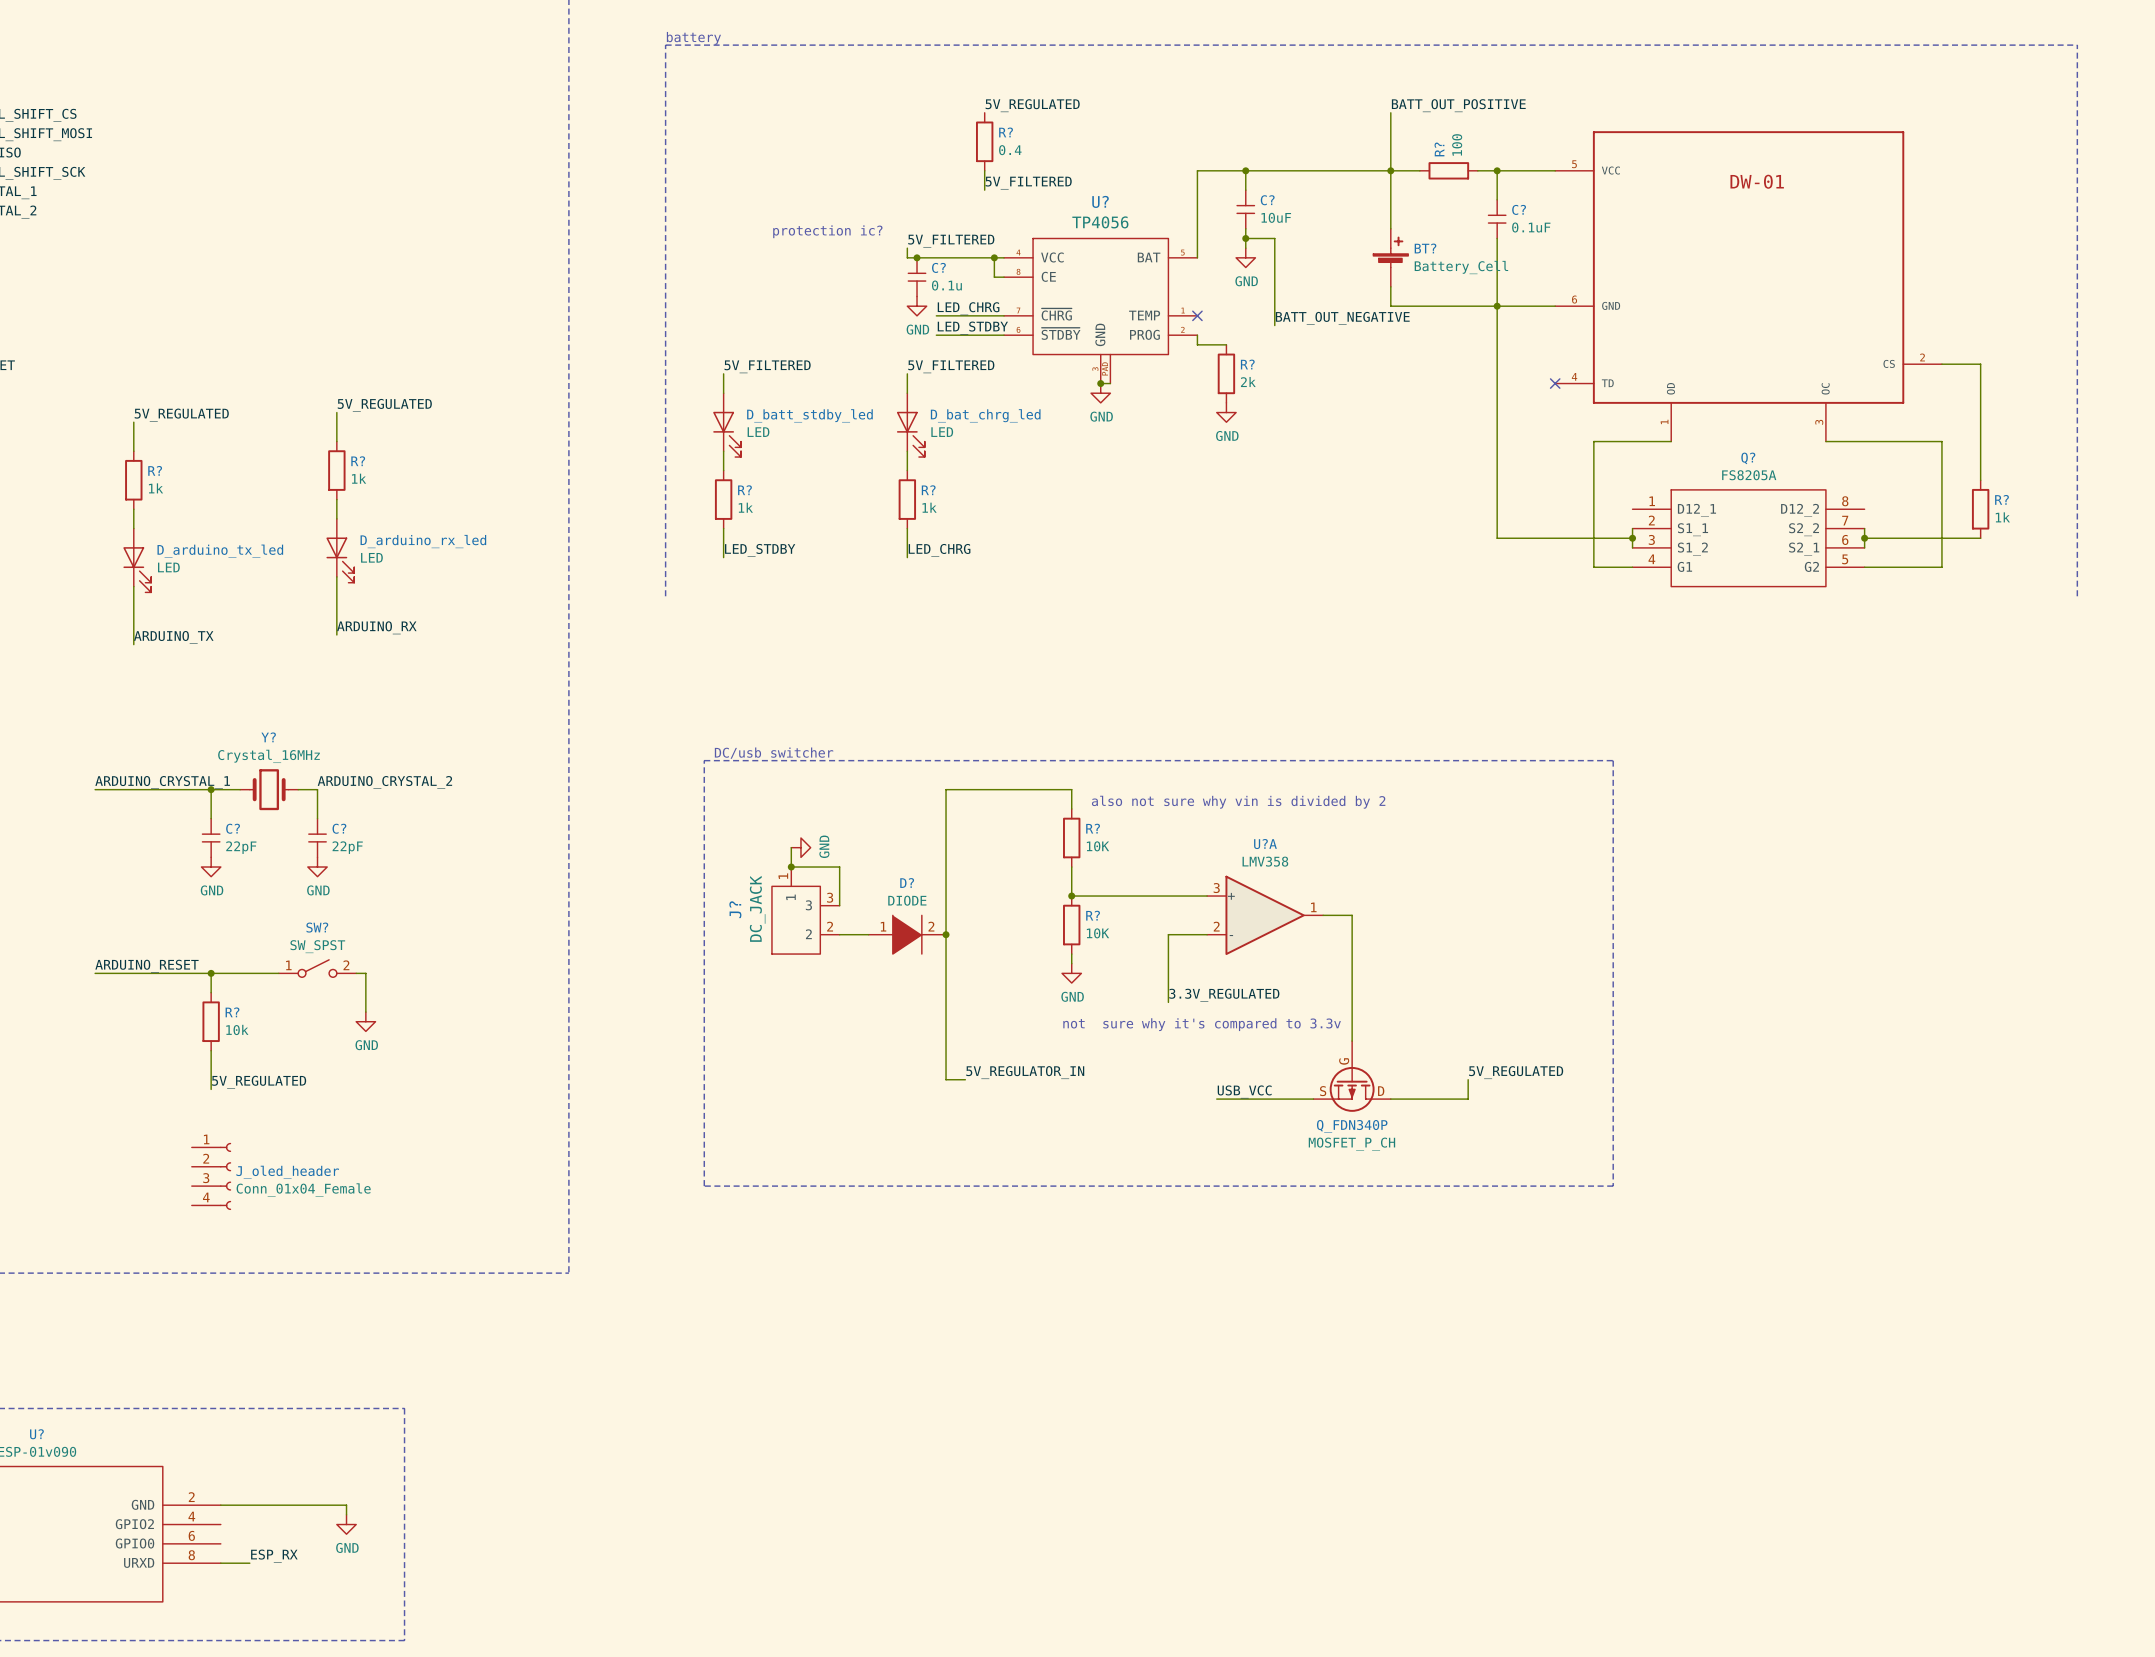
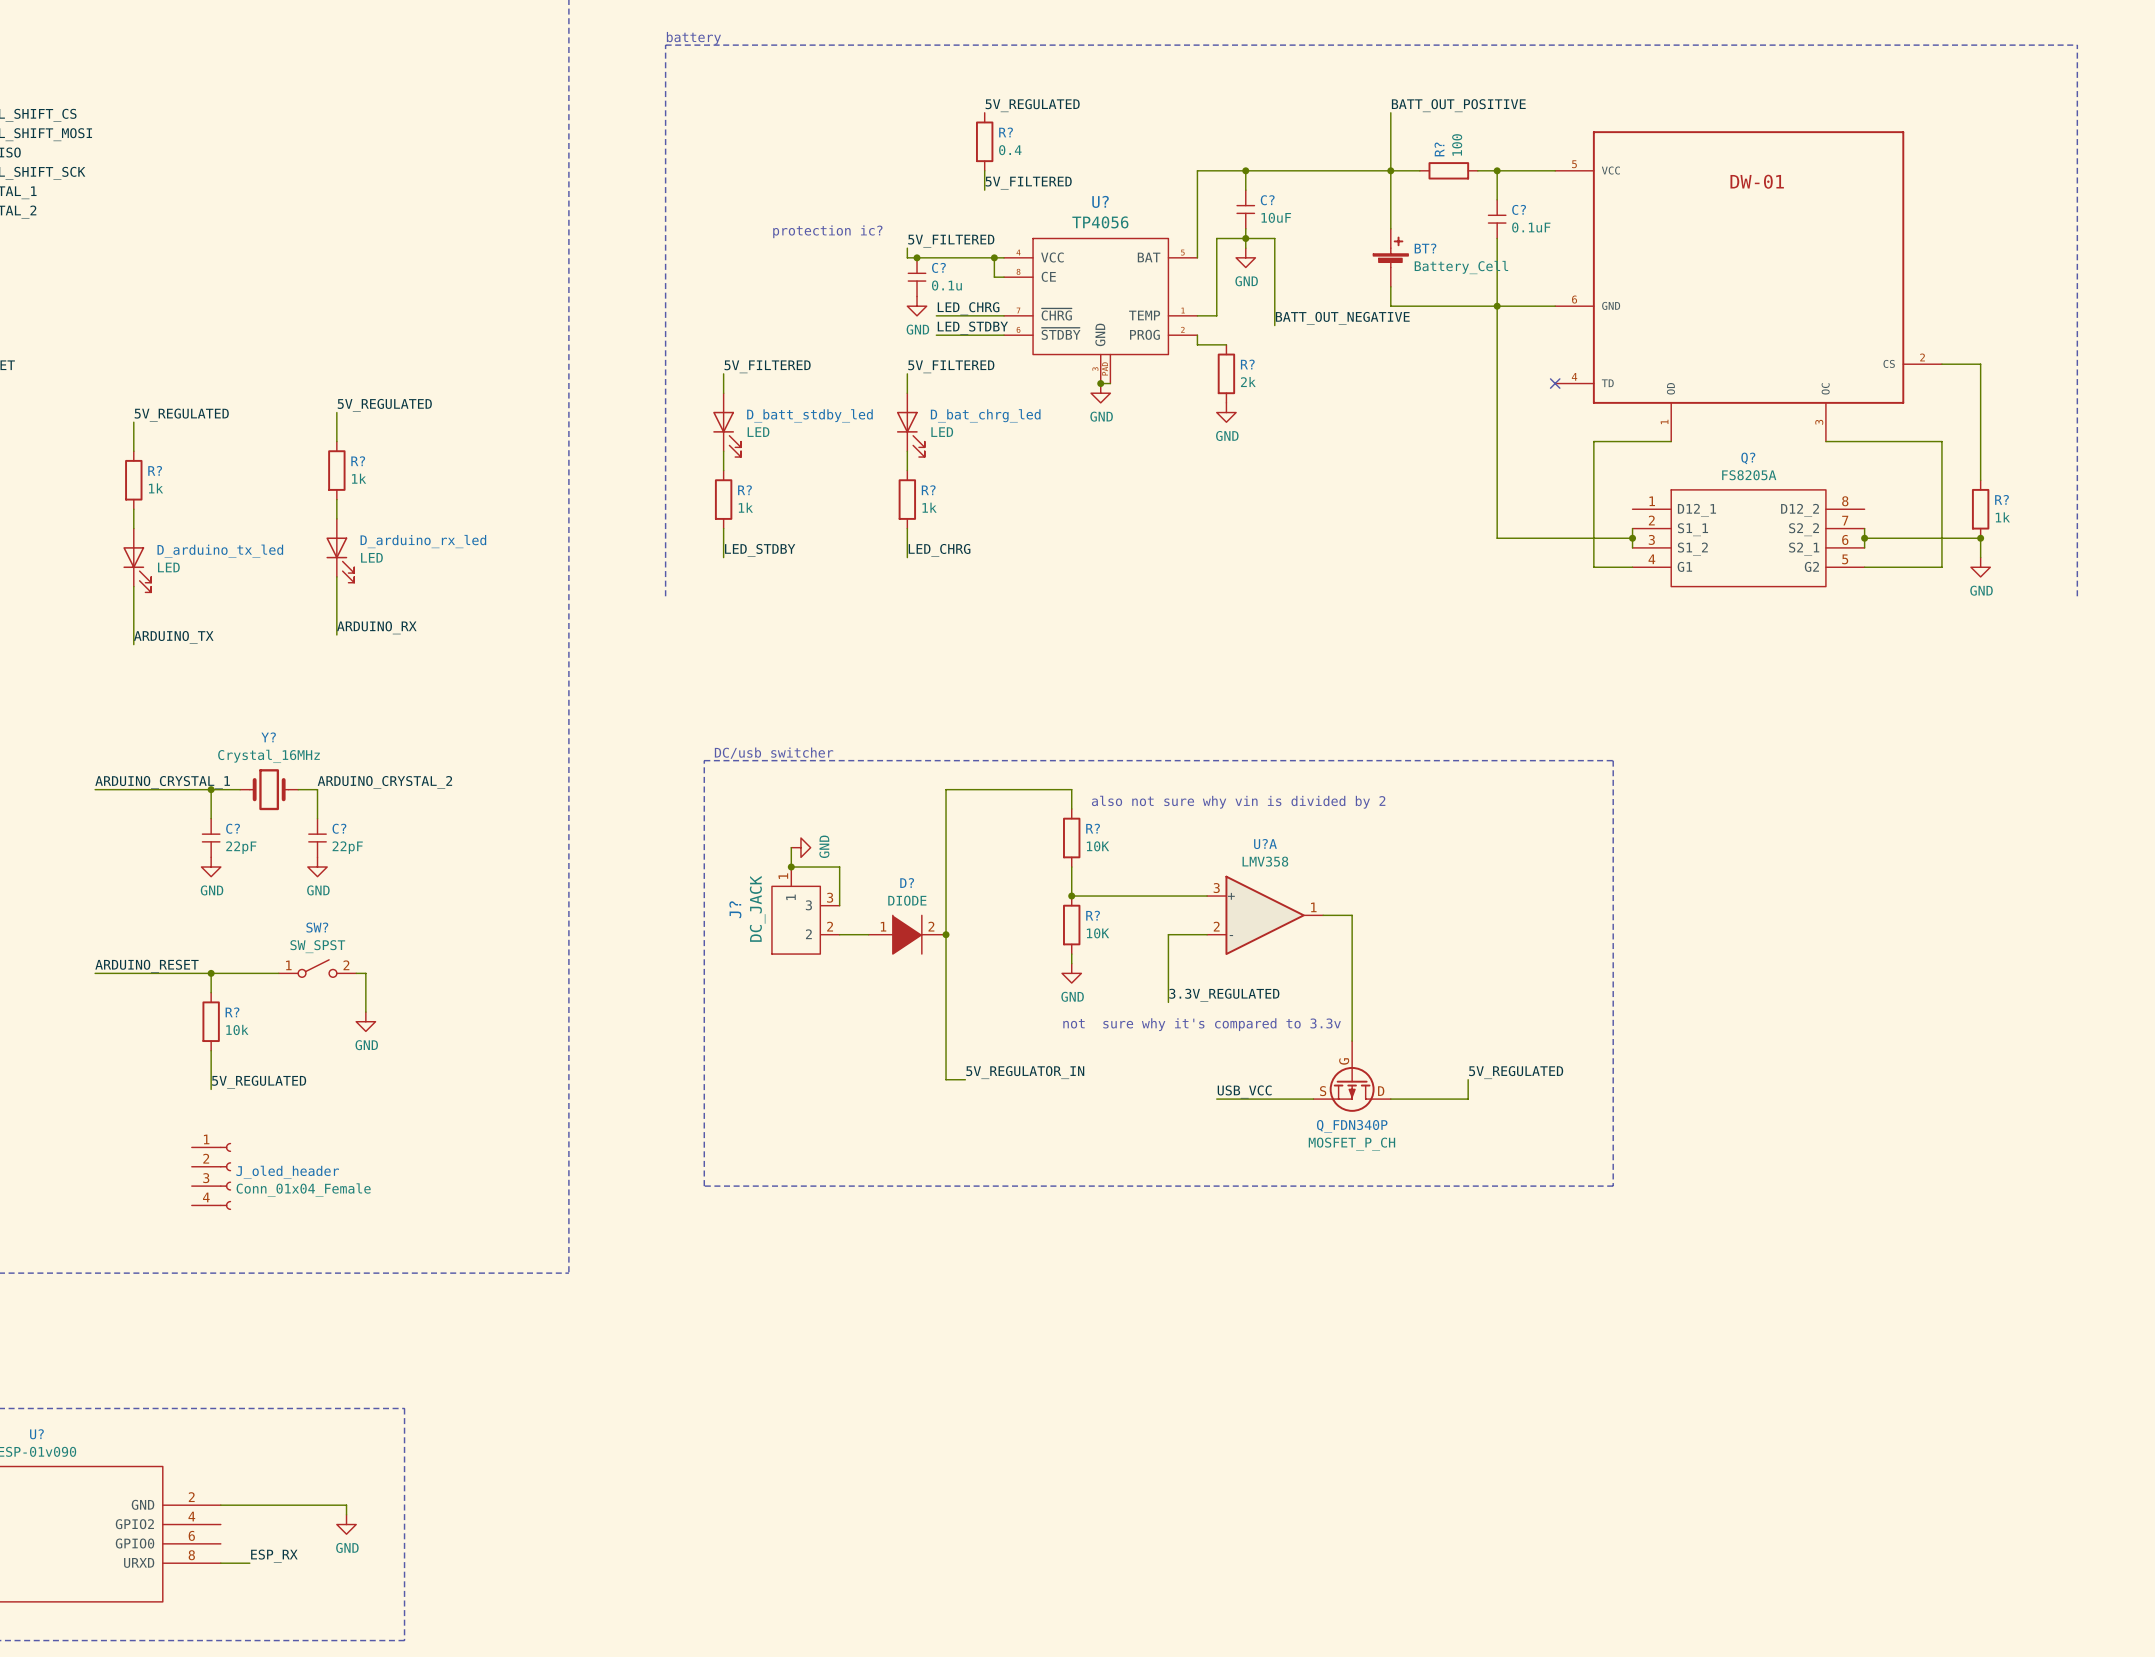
wire: none -> (1245, 238) (1216, 238) (1216, 315) (1197, 315)
no-connect mark: (1197, 315) -> none
wire: none -> (1980, 538) (1980, 557)
junction: none -> (1980, 538)
power symbol: none -> GND (1980, 567)

